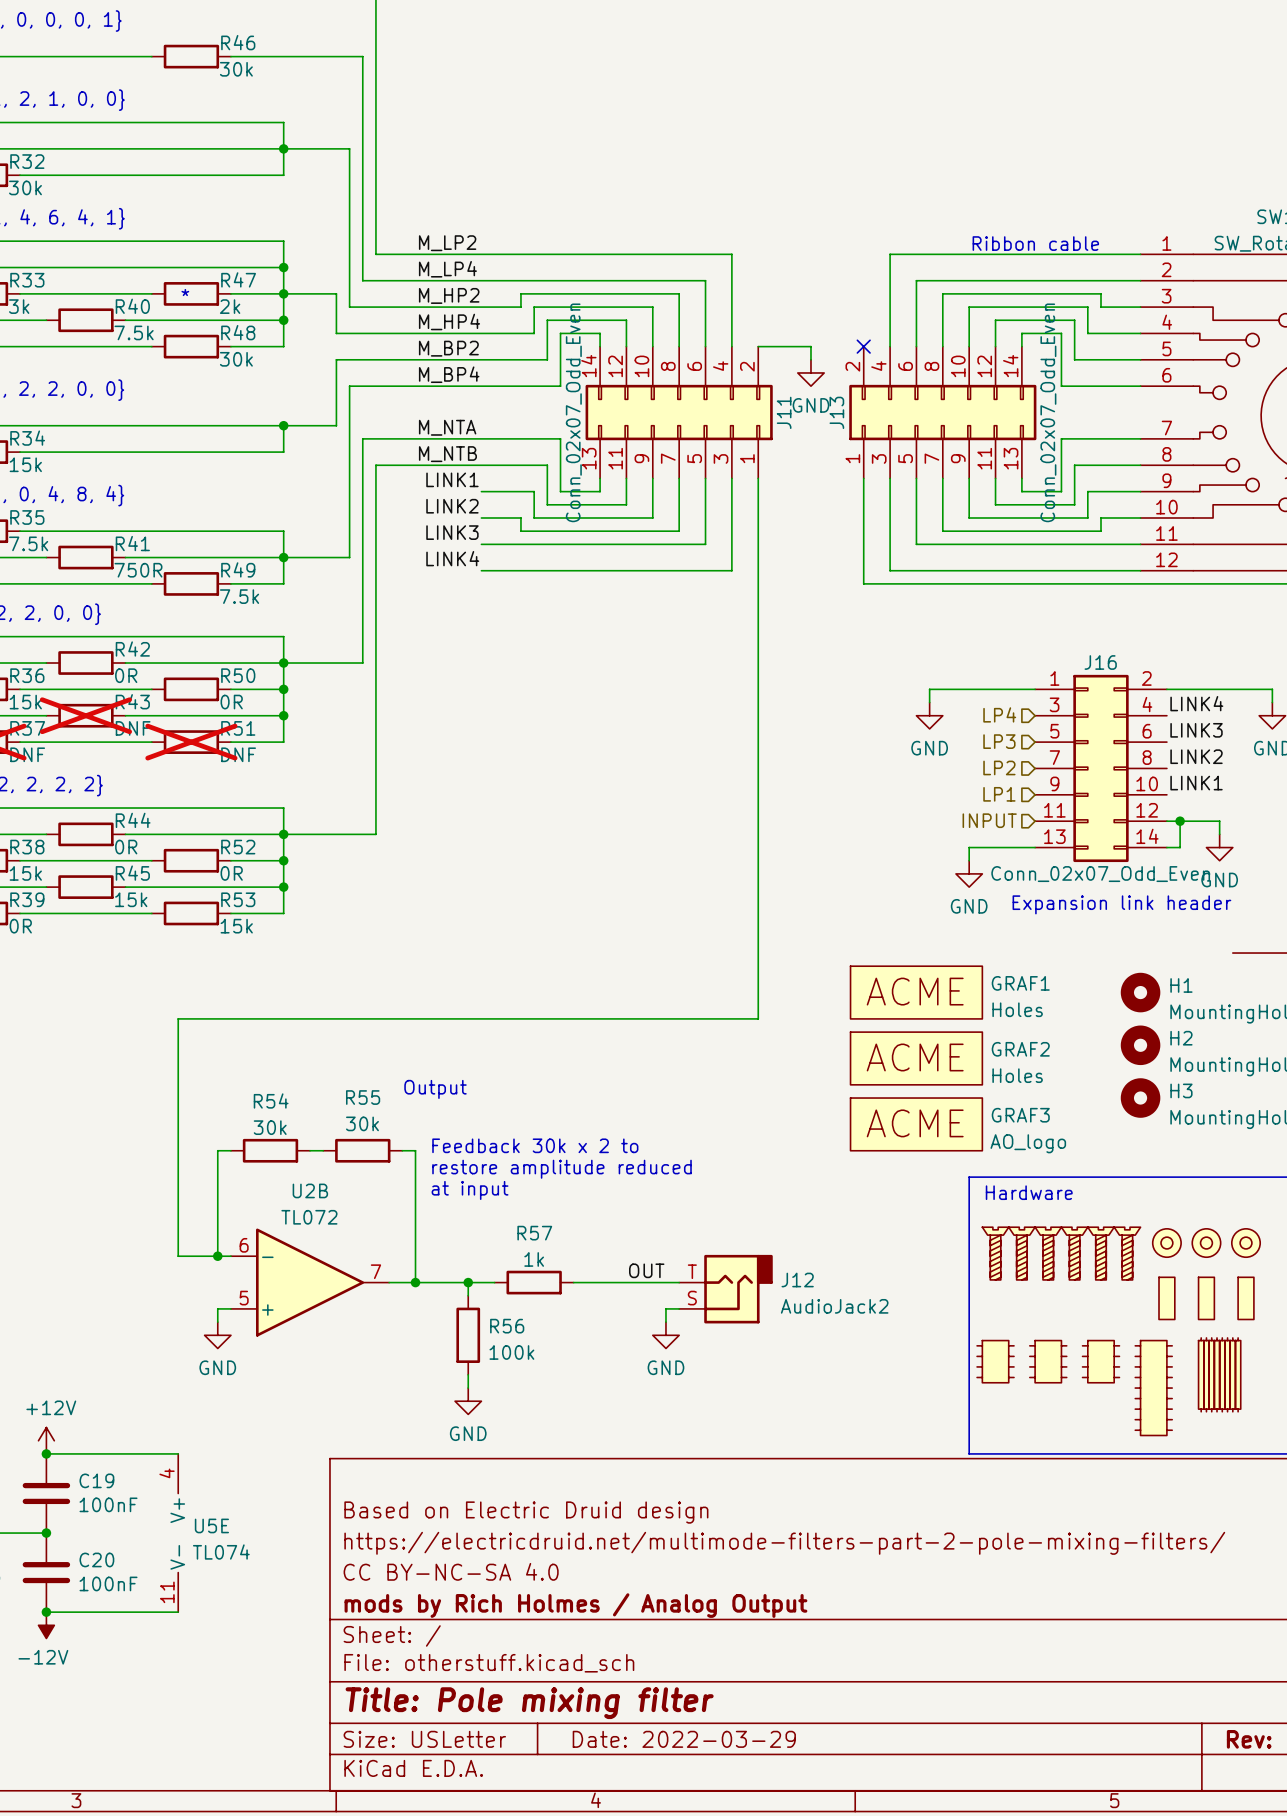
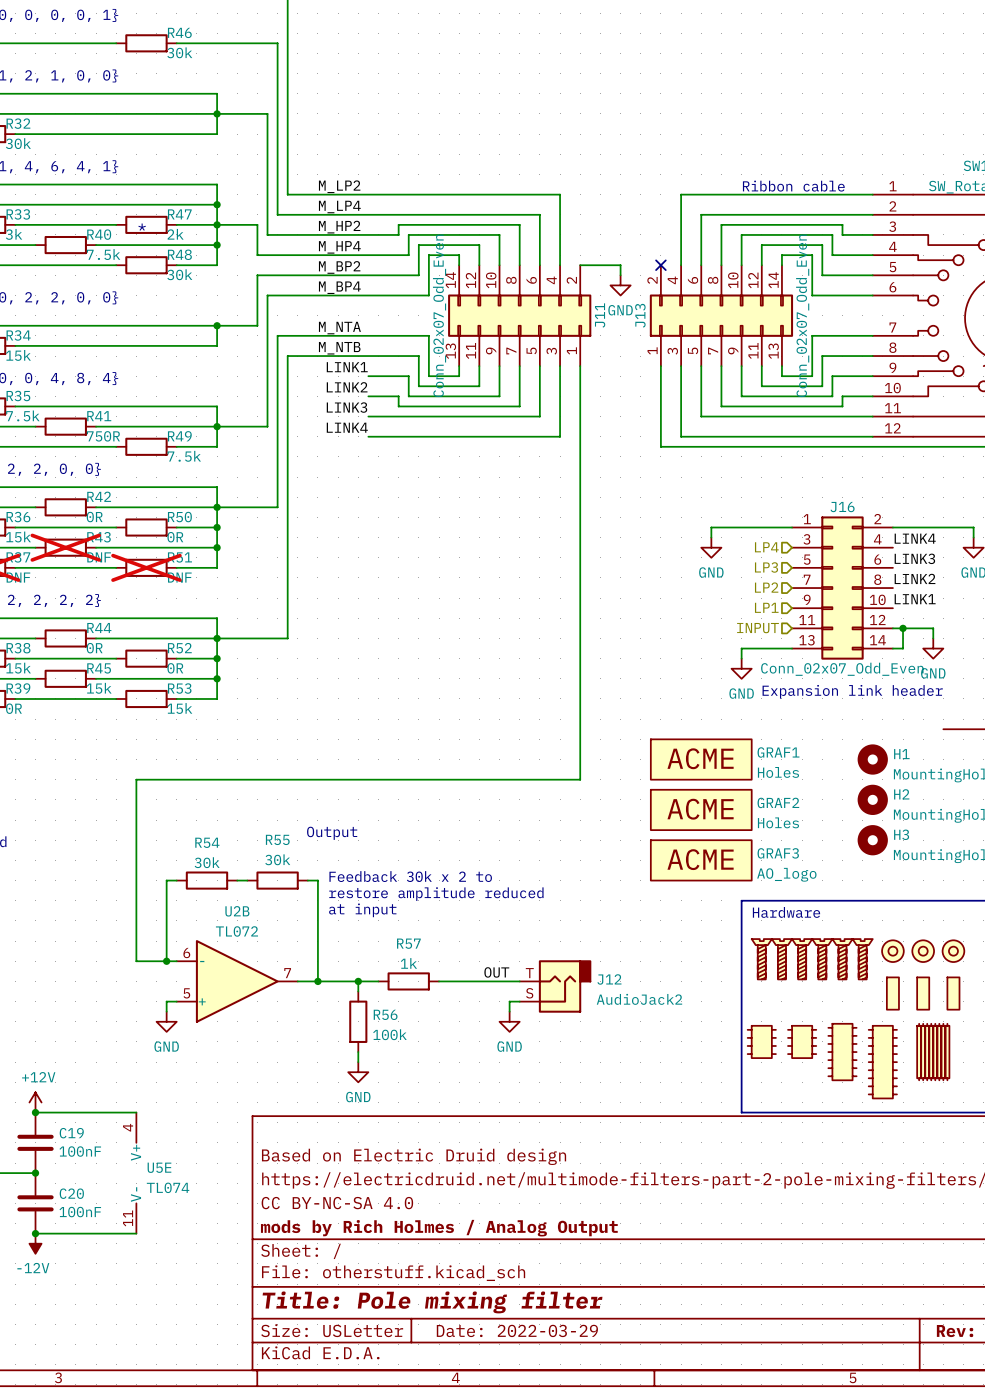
part: (1101, 1361) -> none
part: none -> (842, 1052)

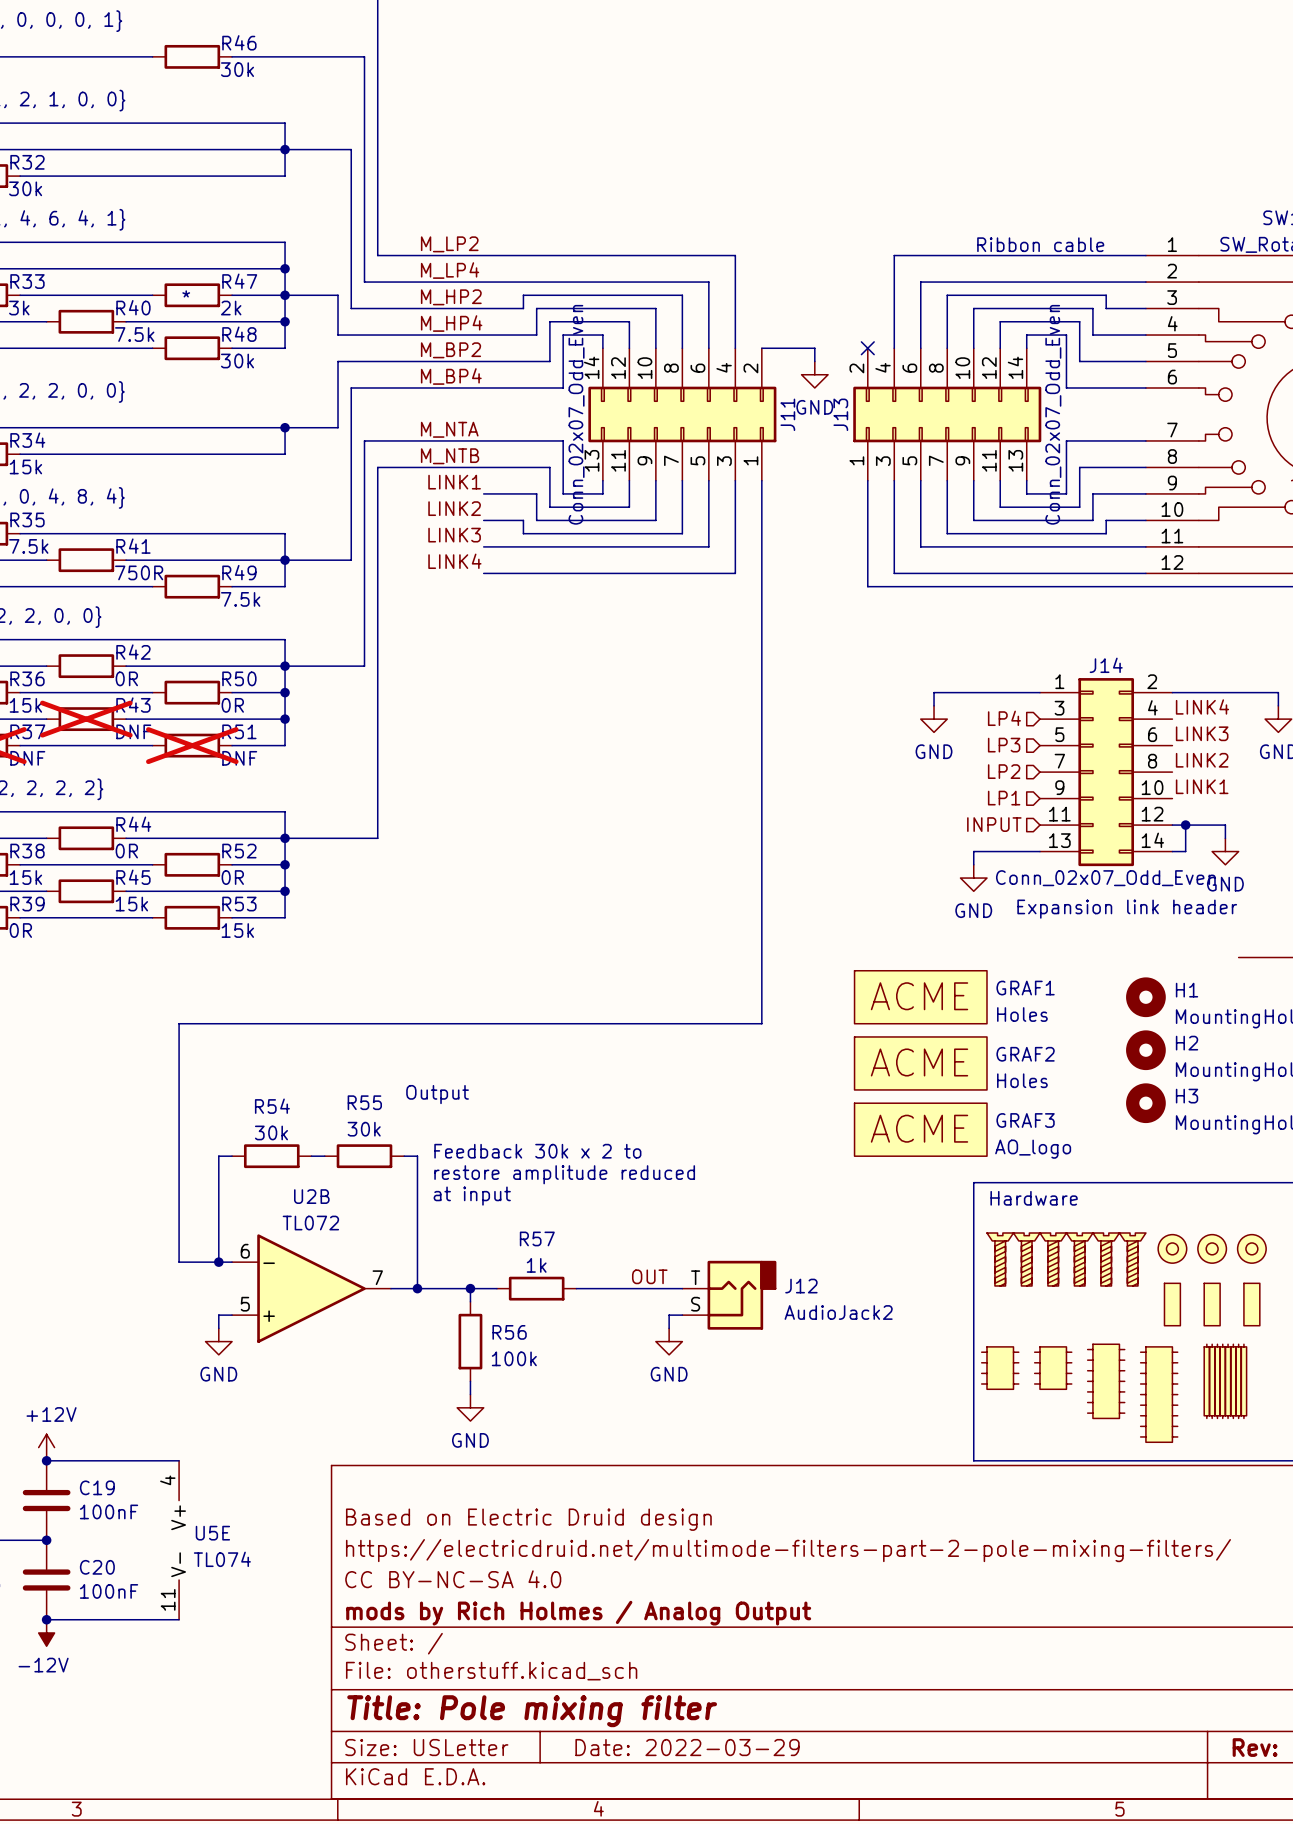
J16 name: J16 (842, 507) -> J14 (1106, 665)

